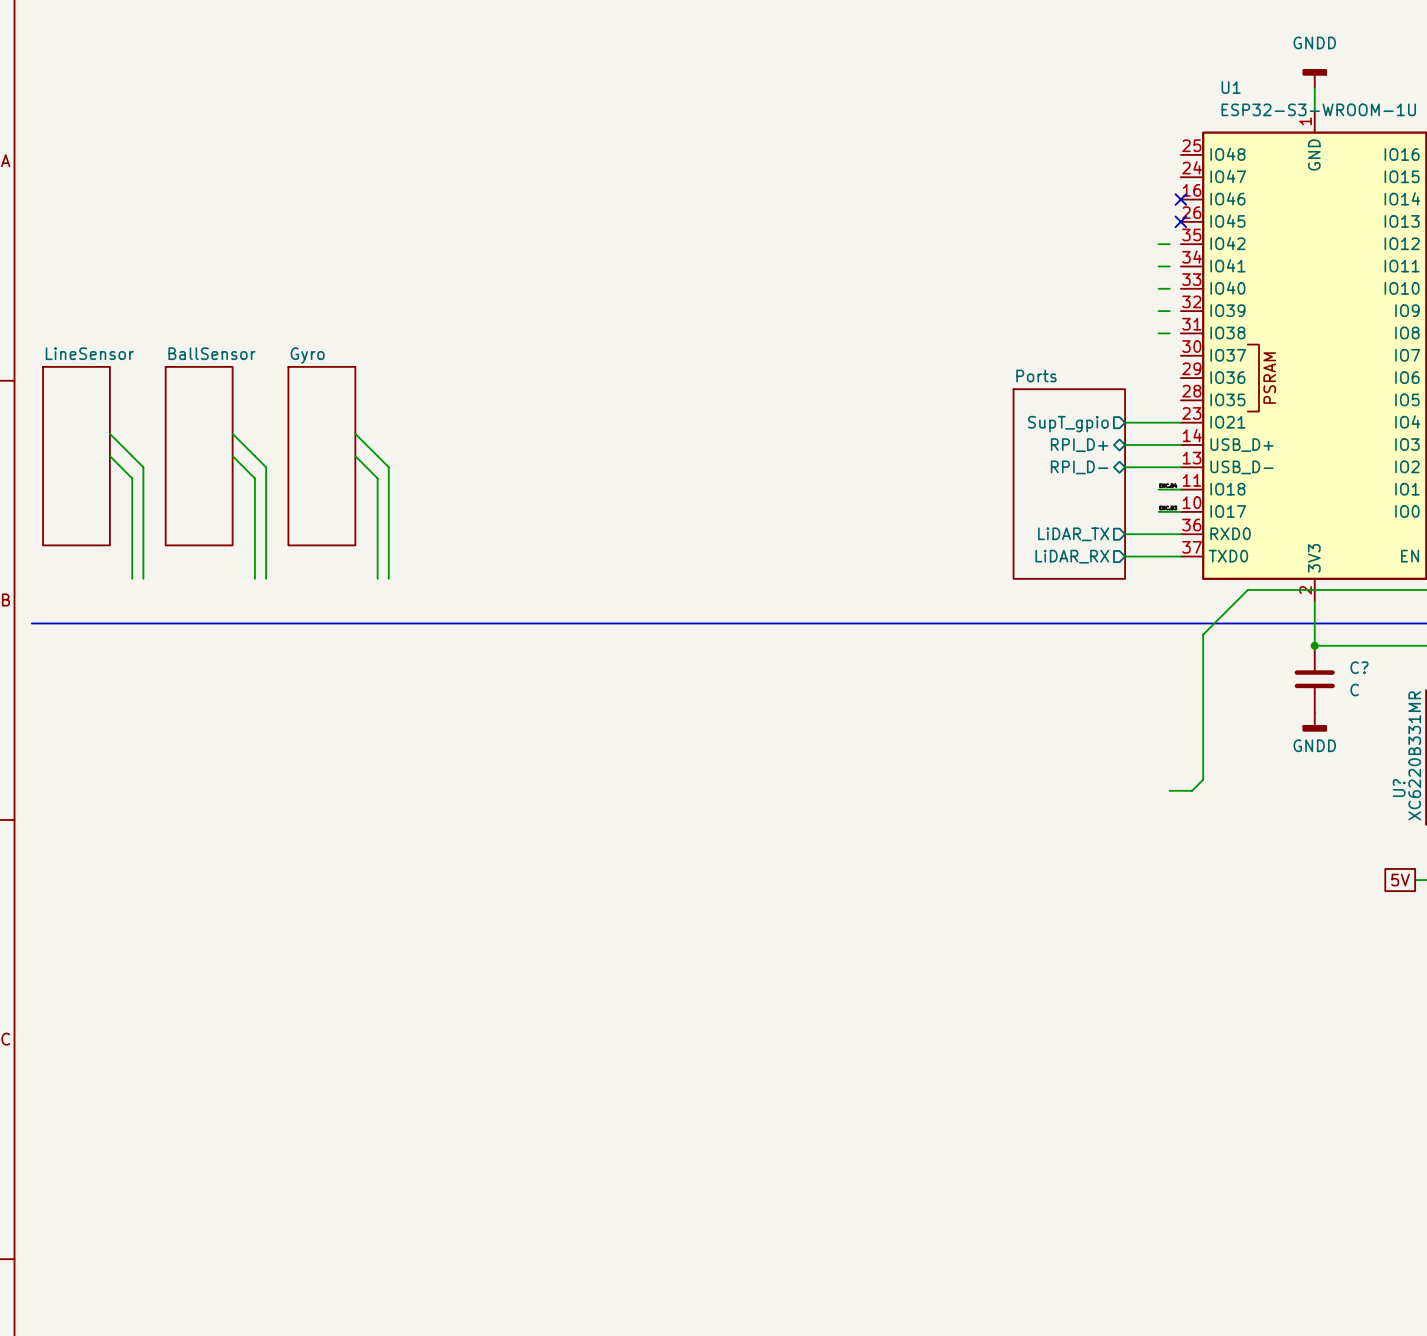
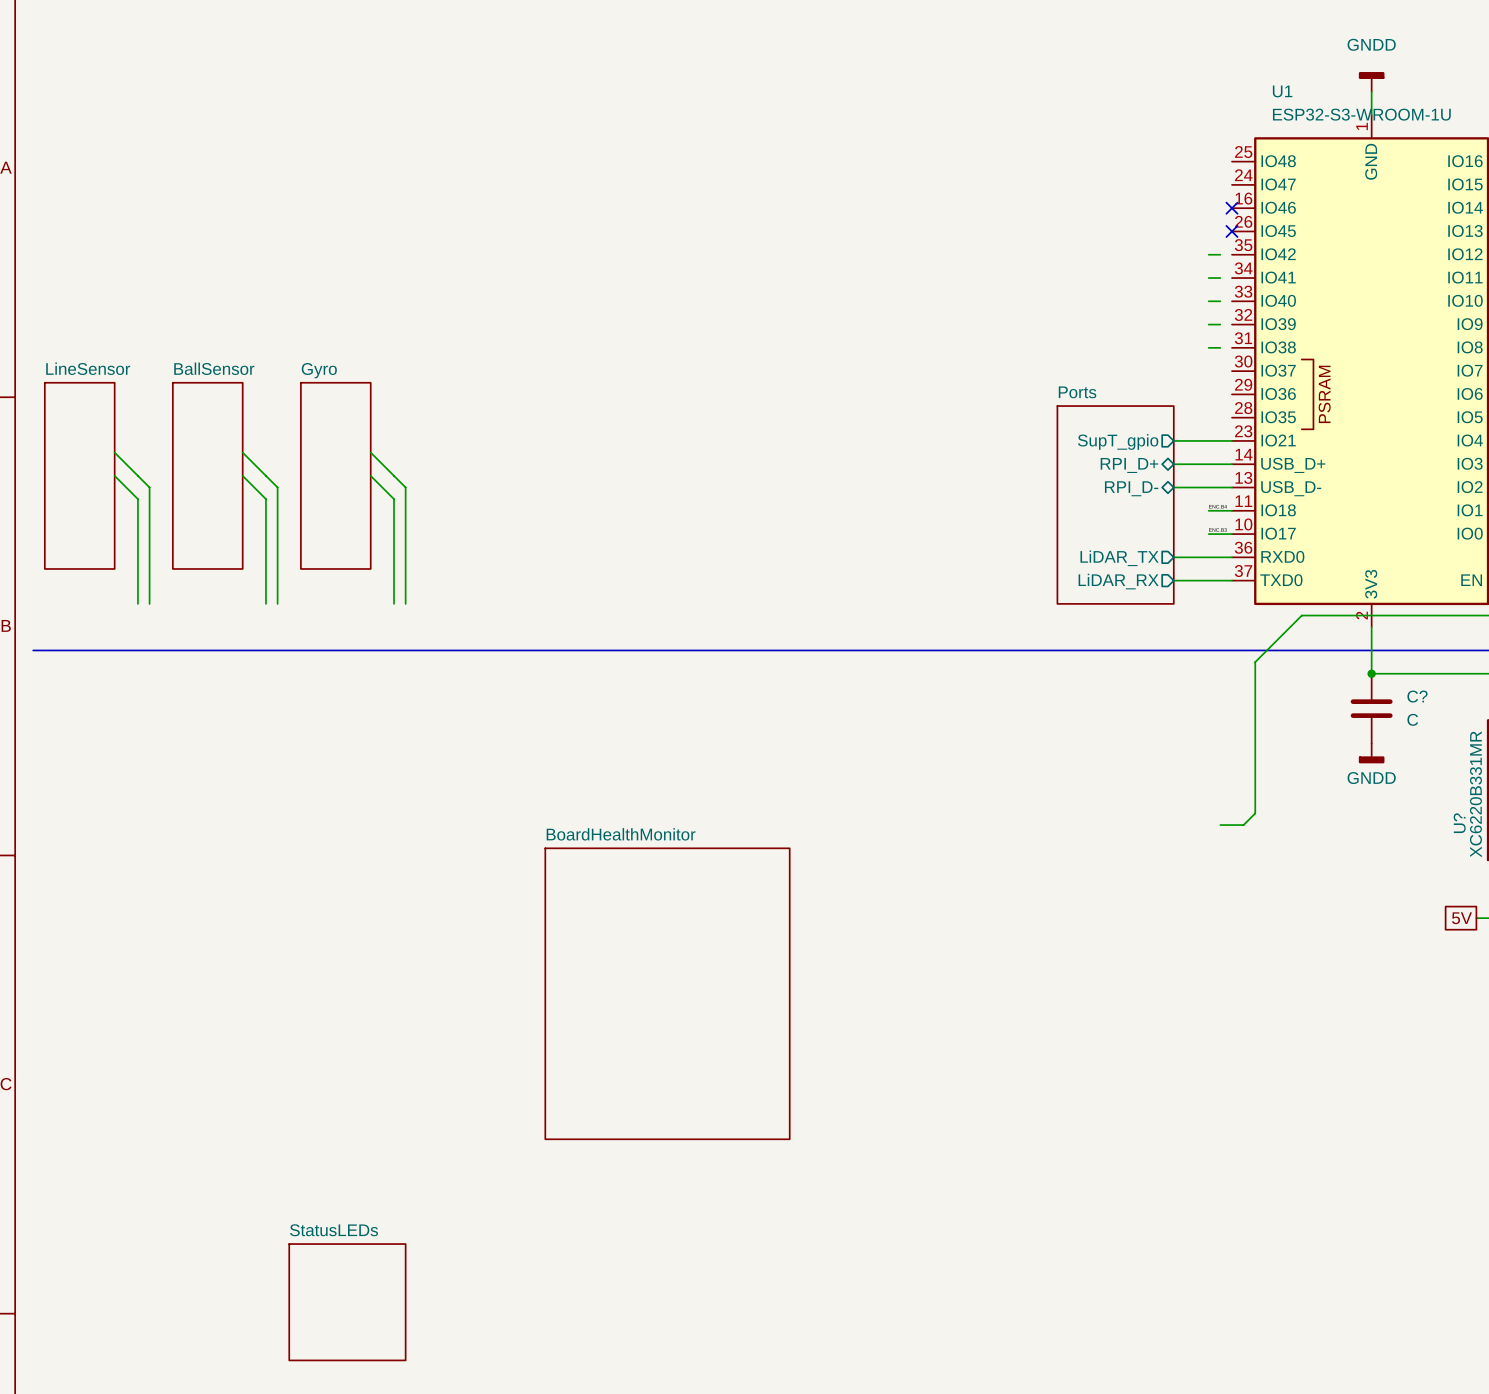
sheet BoardHealthMonitor: none -> (667, 993)
sheet StatusLEDs: none -> (347, 1302)

